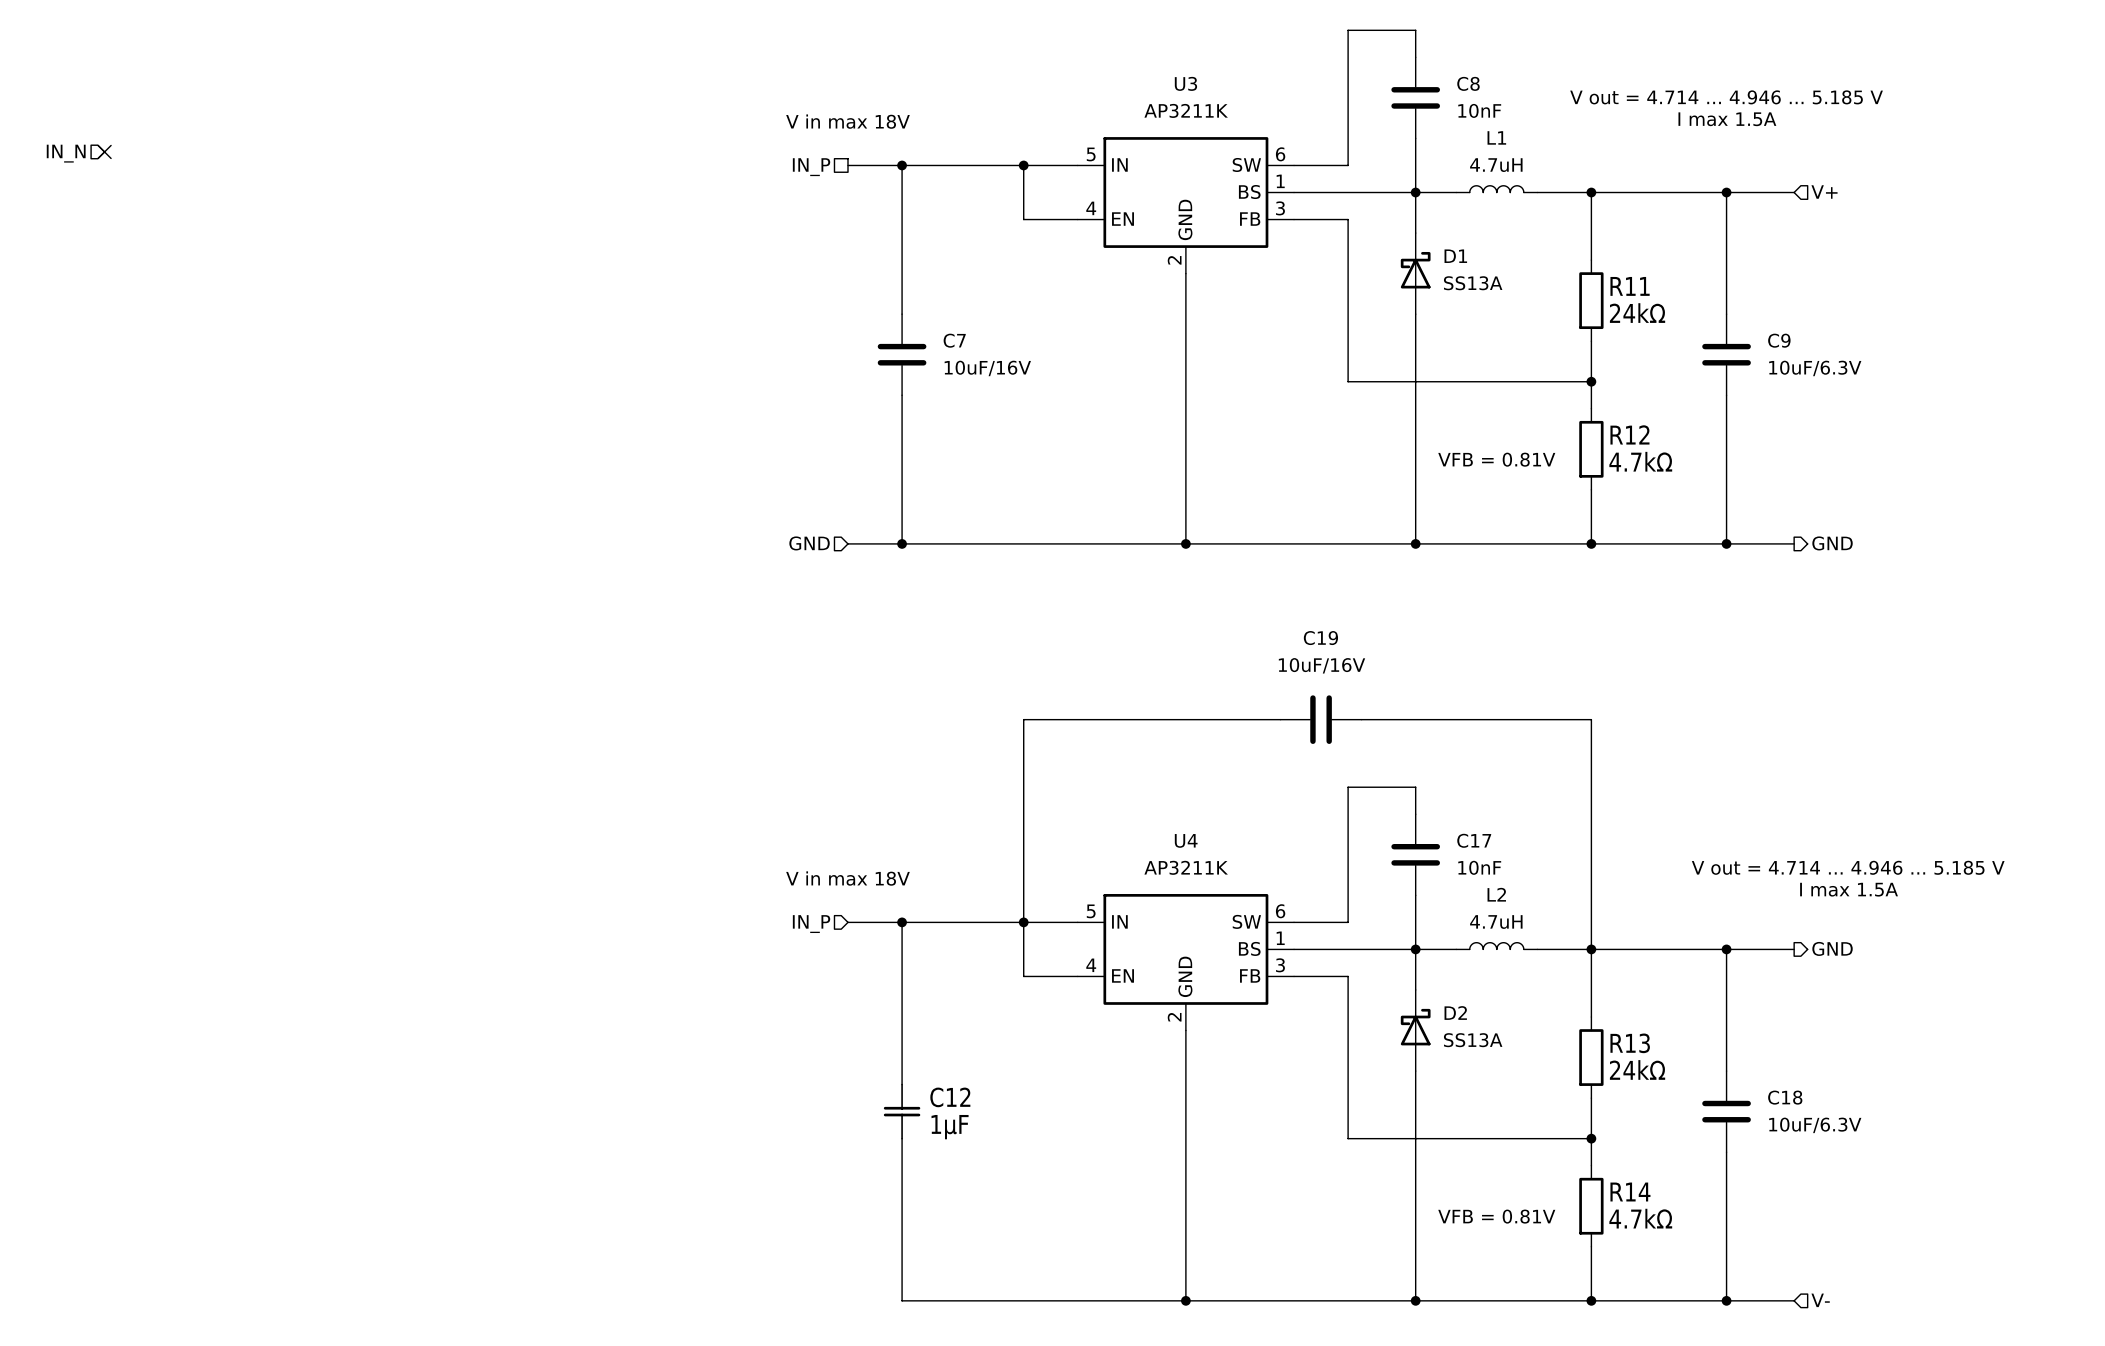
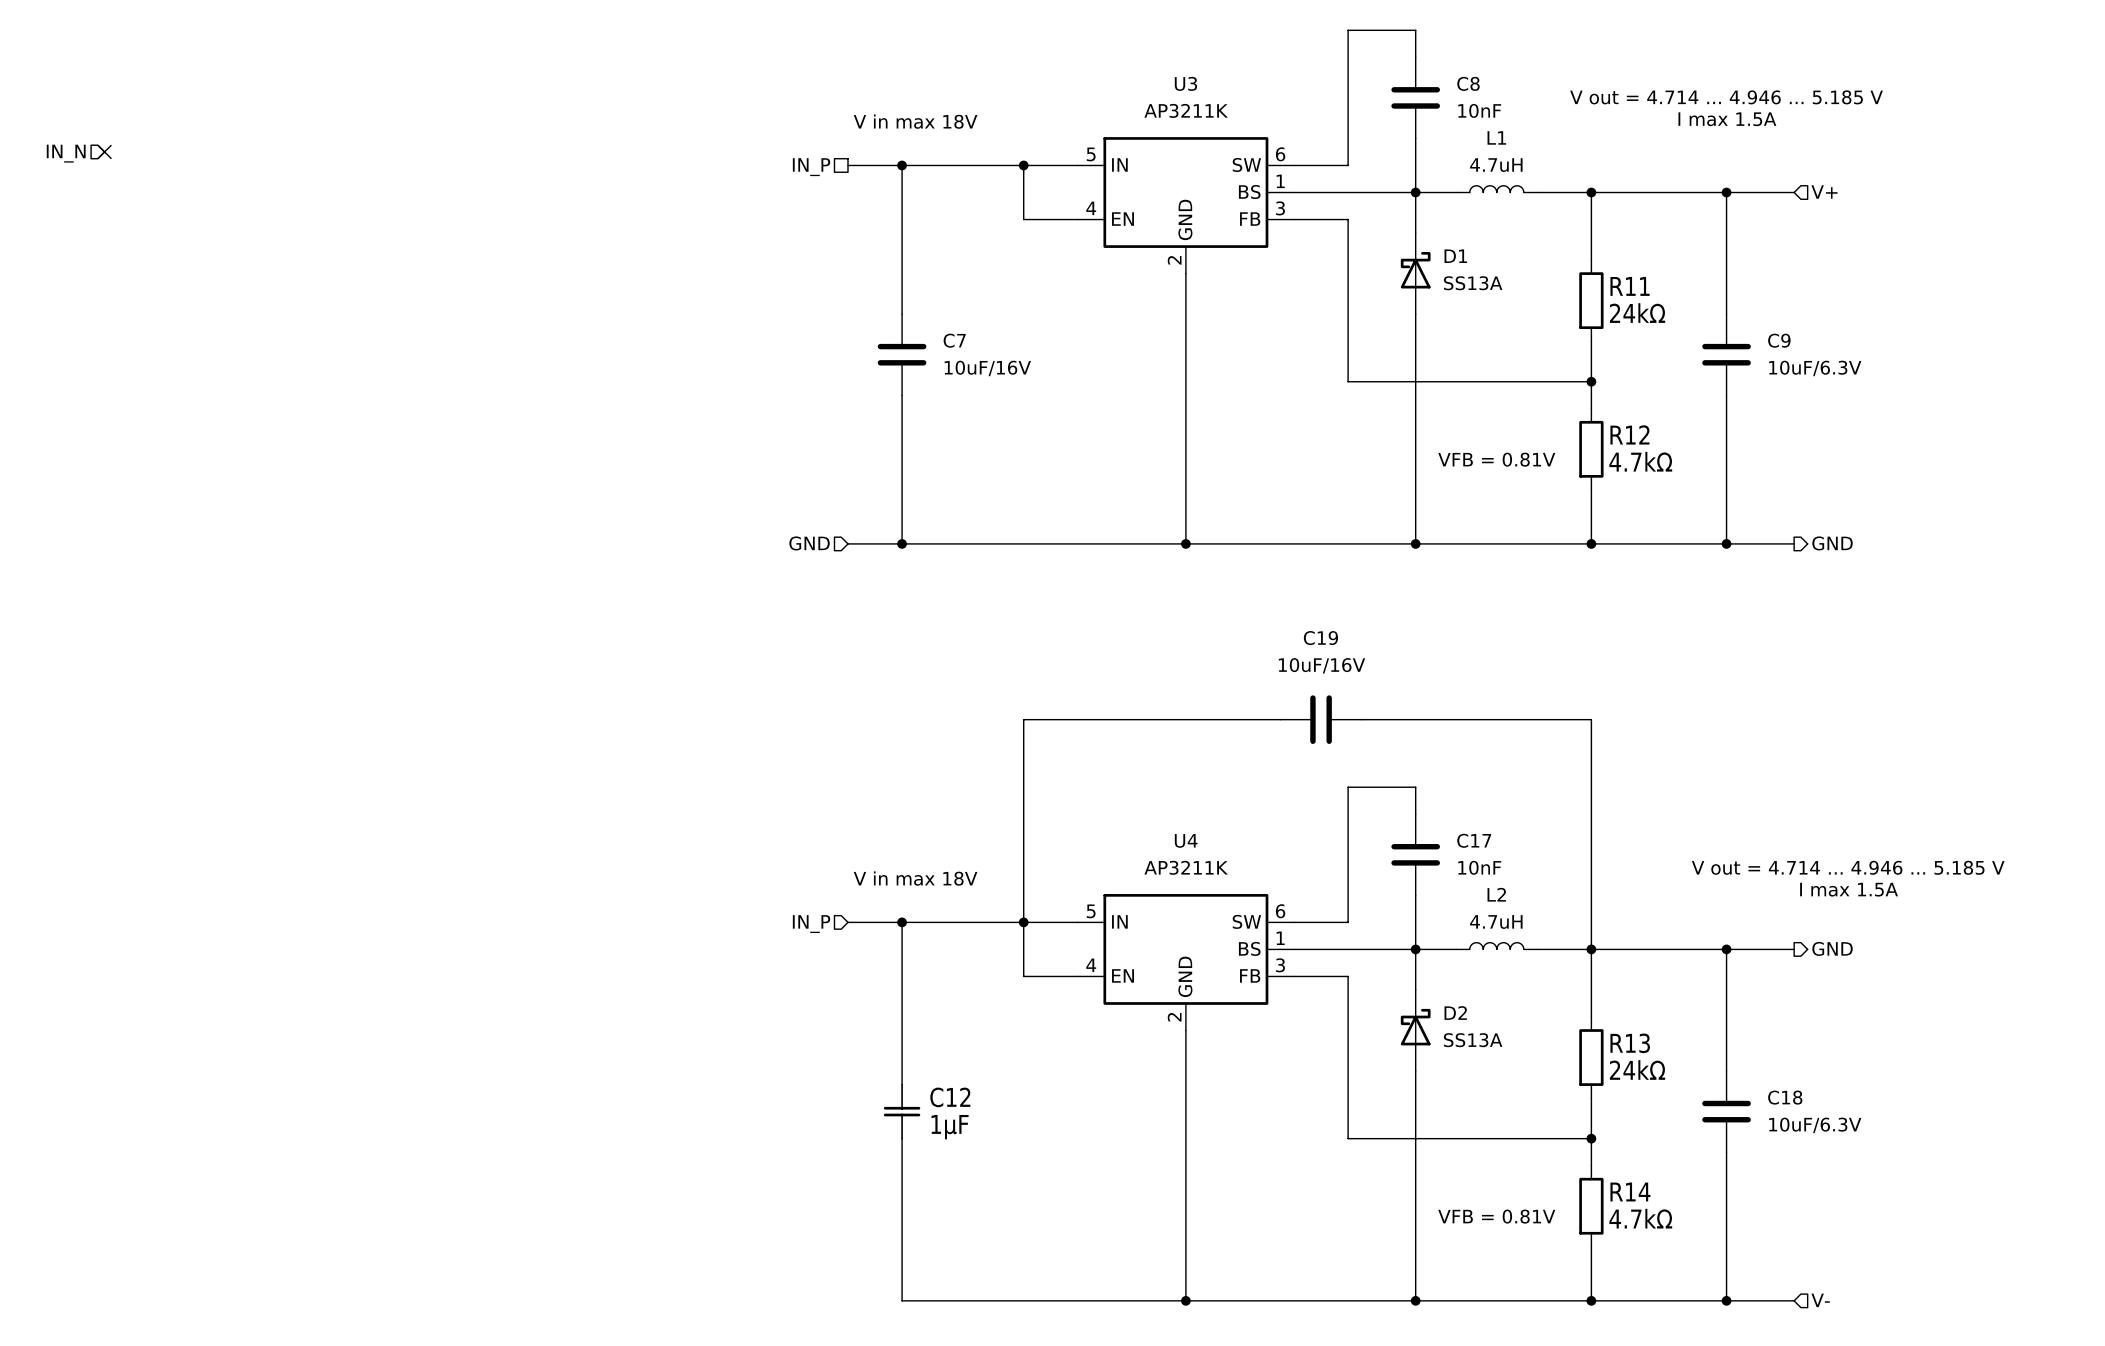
text position: V in max 18V (847, 121) -> V in max 18V (915, 121)
text position: V in max 18V (847, 878) -> V in max 18V (915, 878)

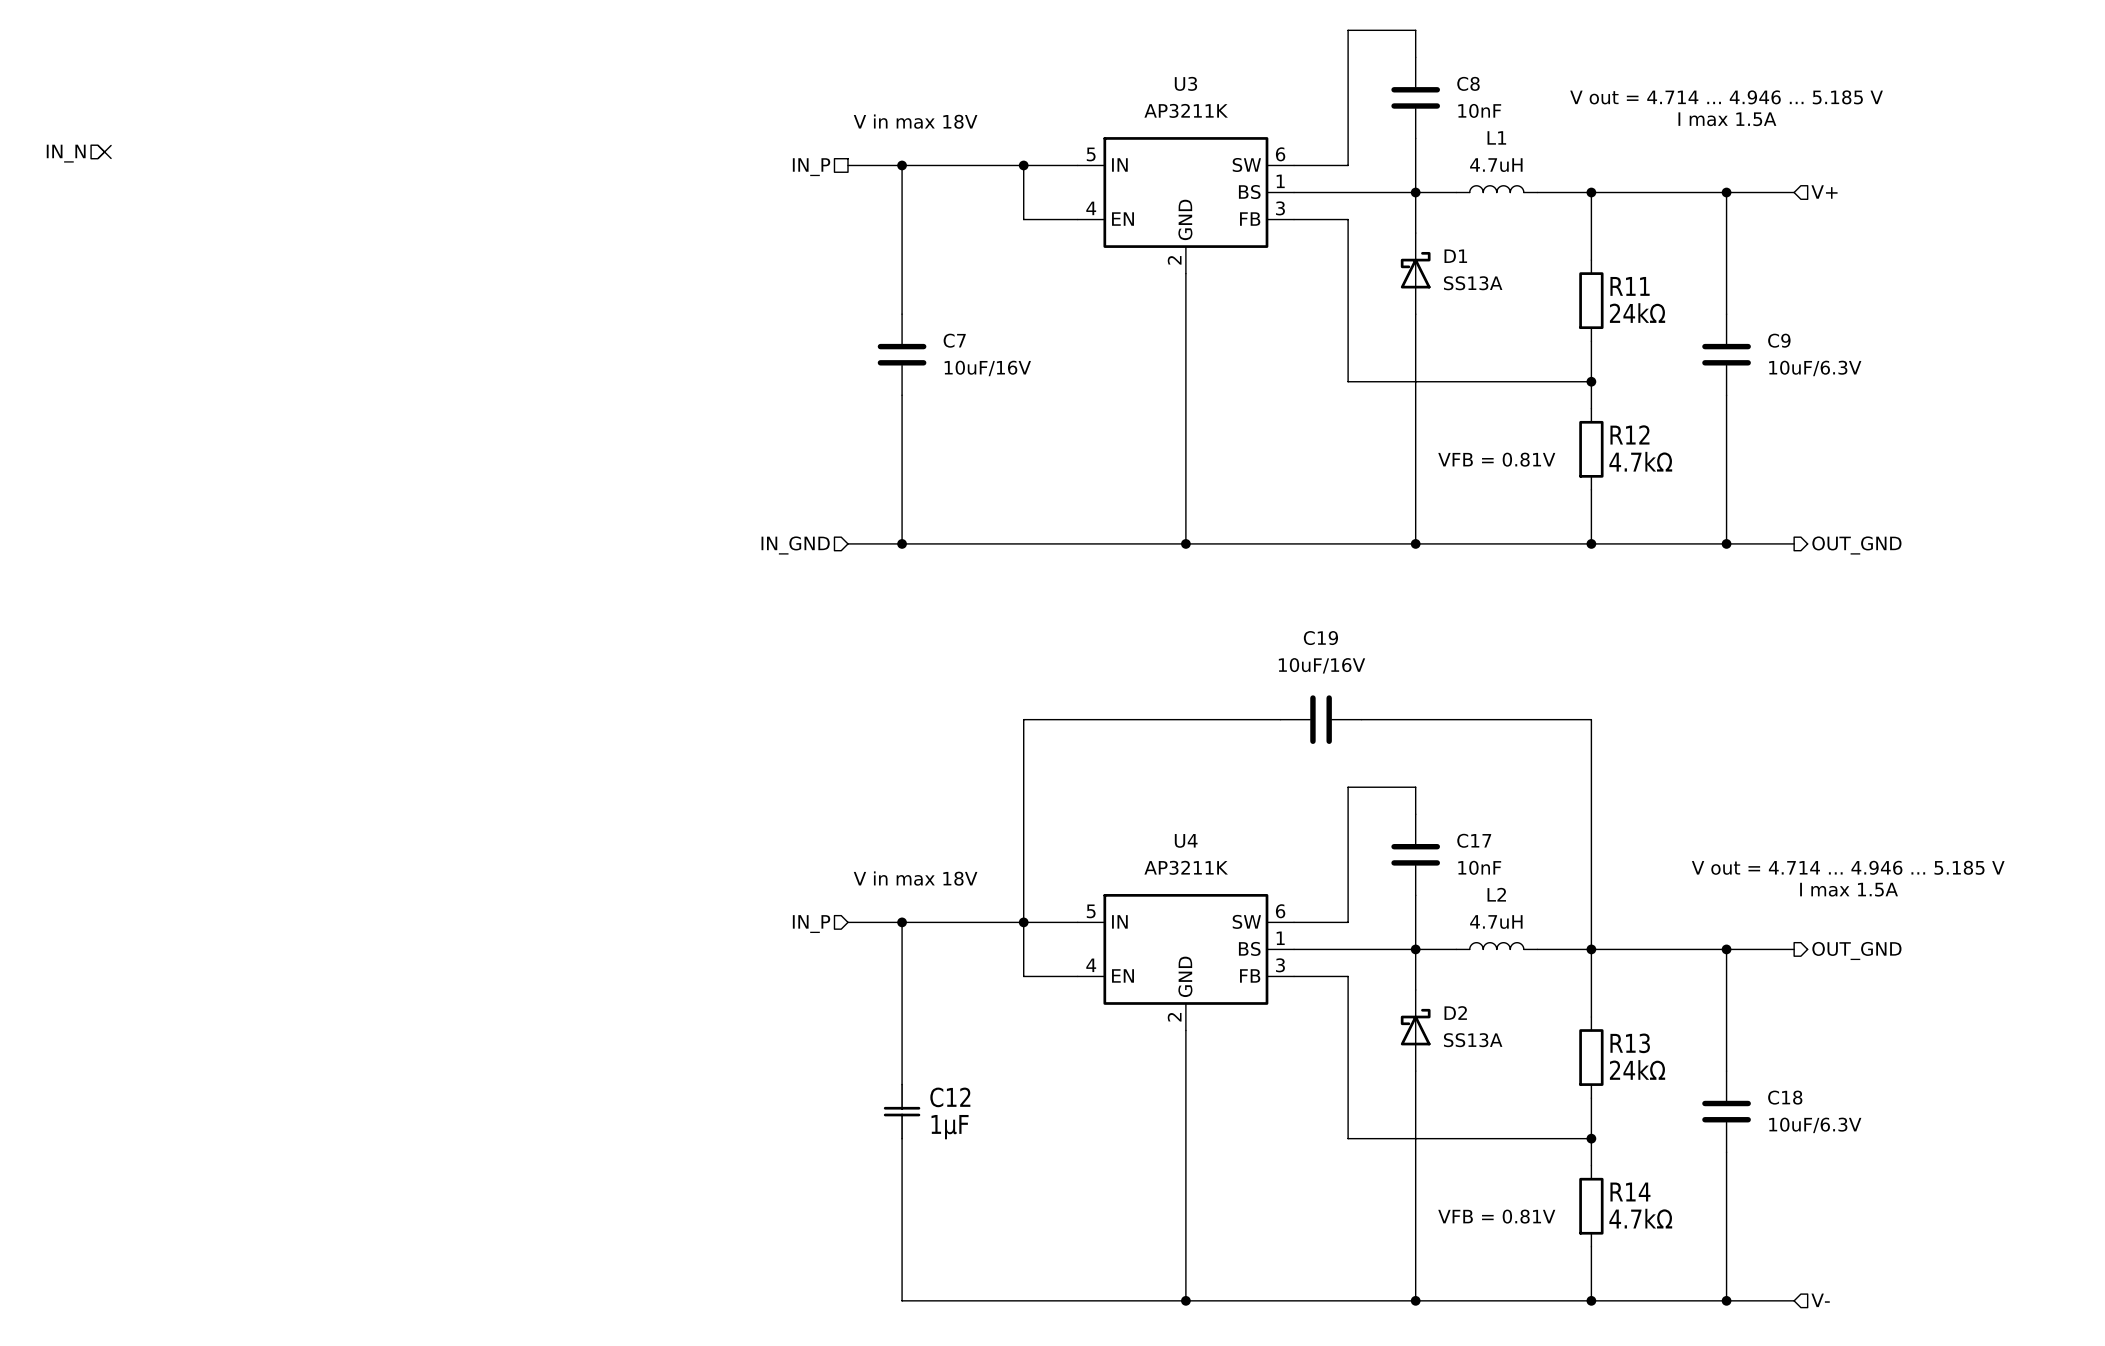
hierarchical label: GND (809, 543) -> IN_GND (795, 545)
hierarchical label: GND (1832, 543) -> OUT_GND (1856, 545)
hierarchical label: GND (1832, 948) -> OUT_GND (1856, 950)

